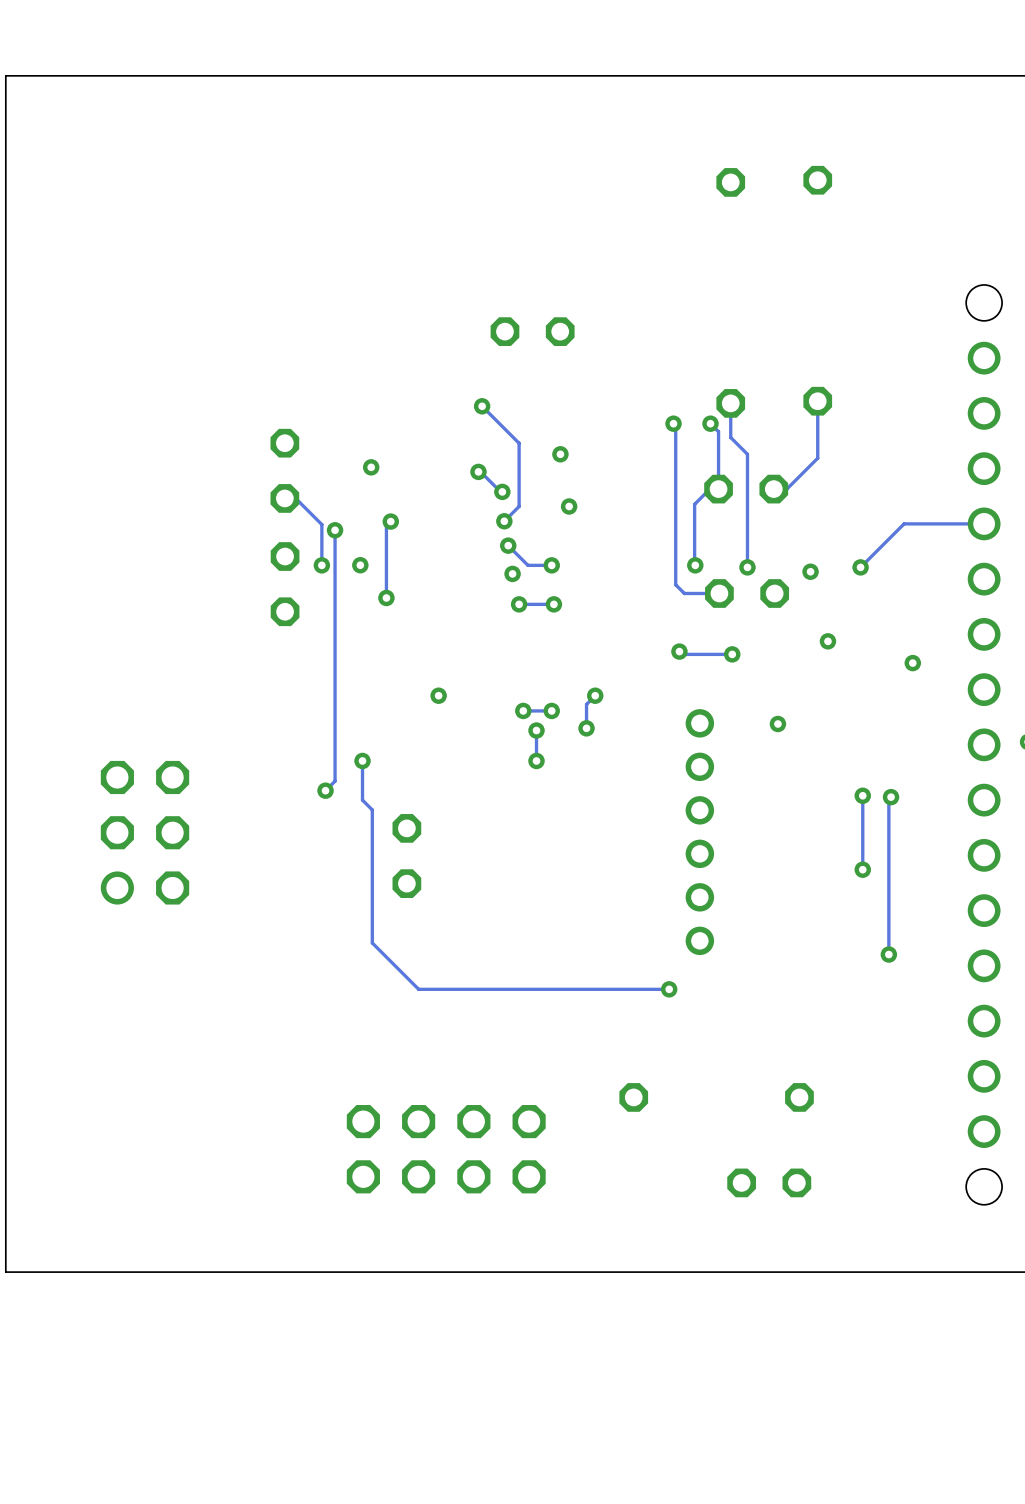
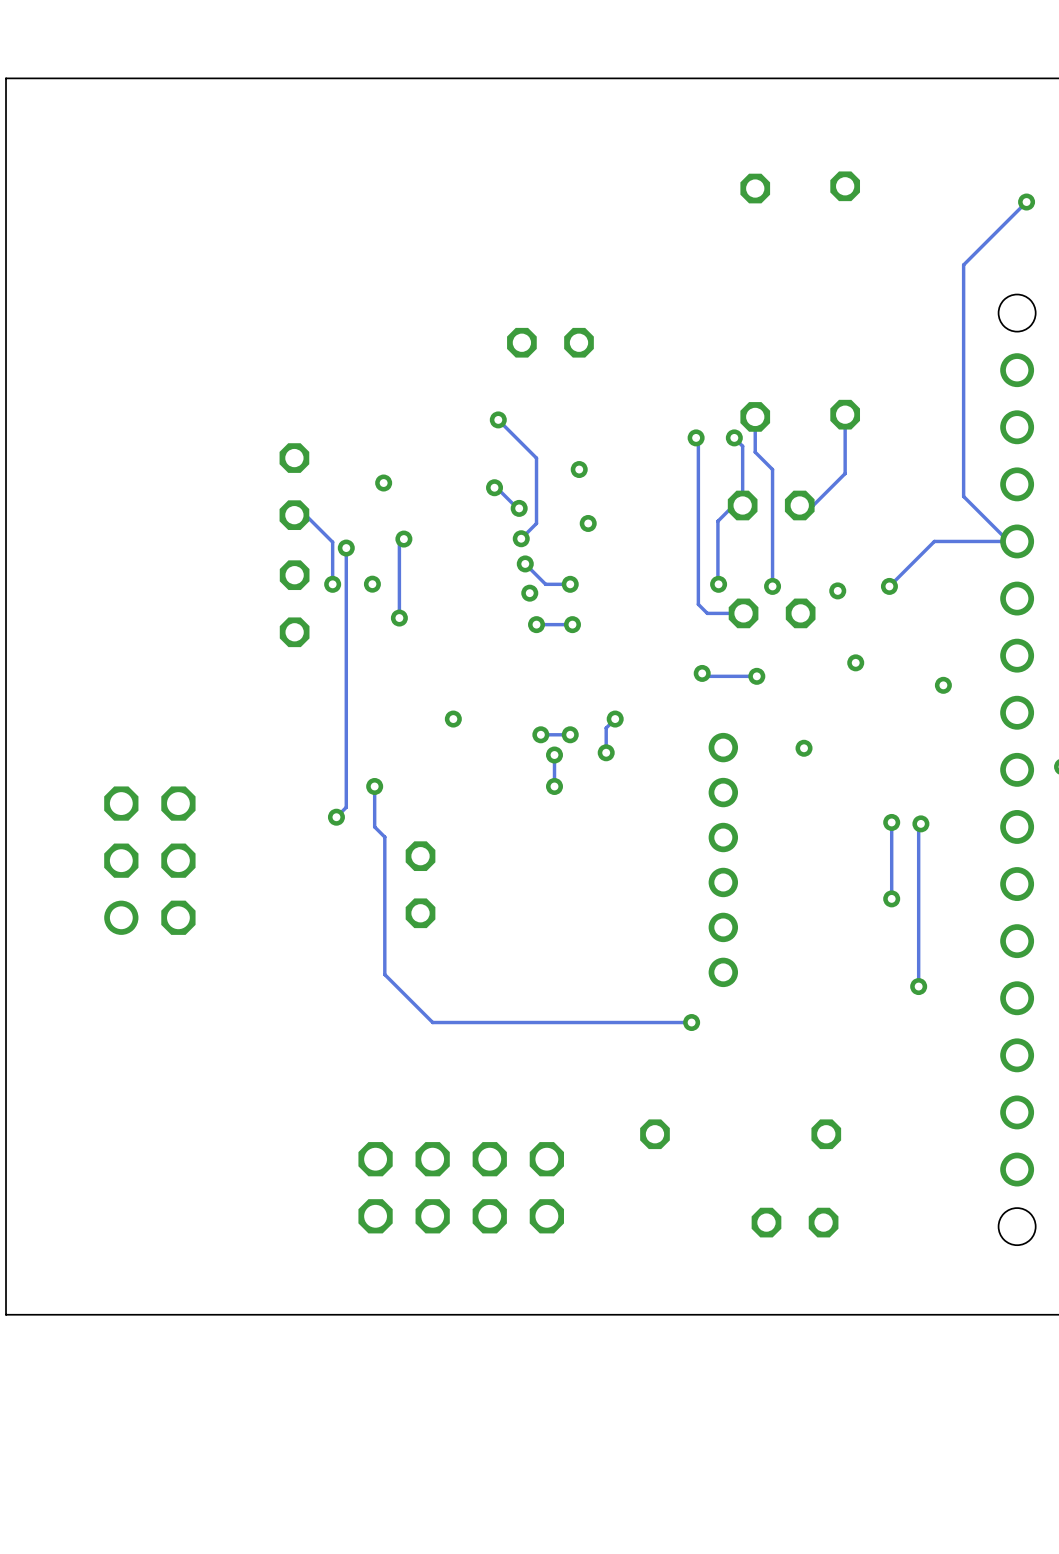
track: none -> (1026, 202) (963, 264) (963, 496) (1008, 541)
via: none -> (1026, 202)

